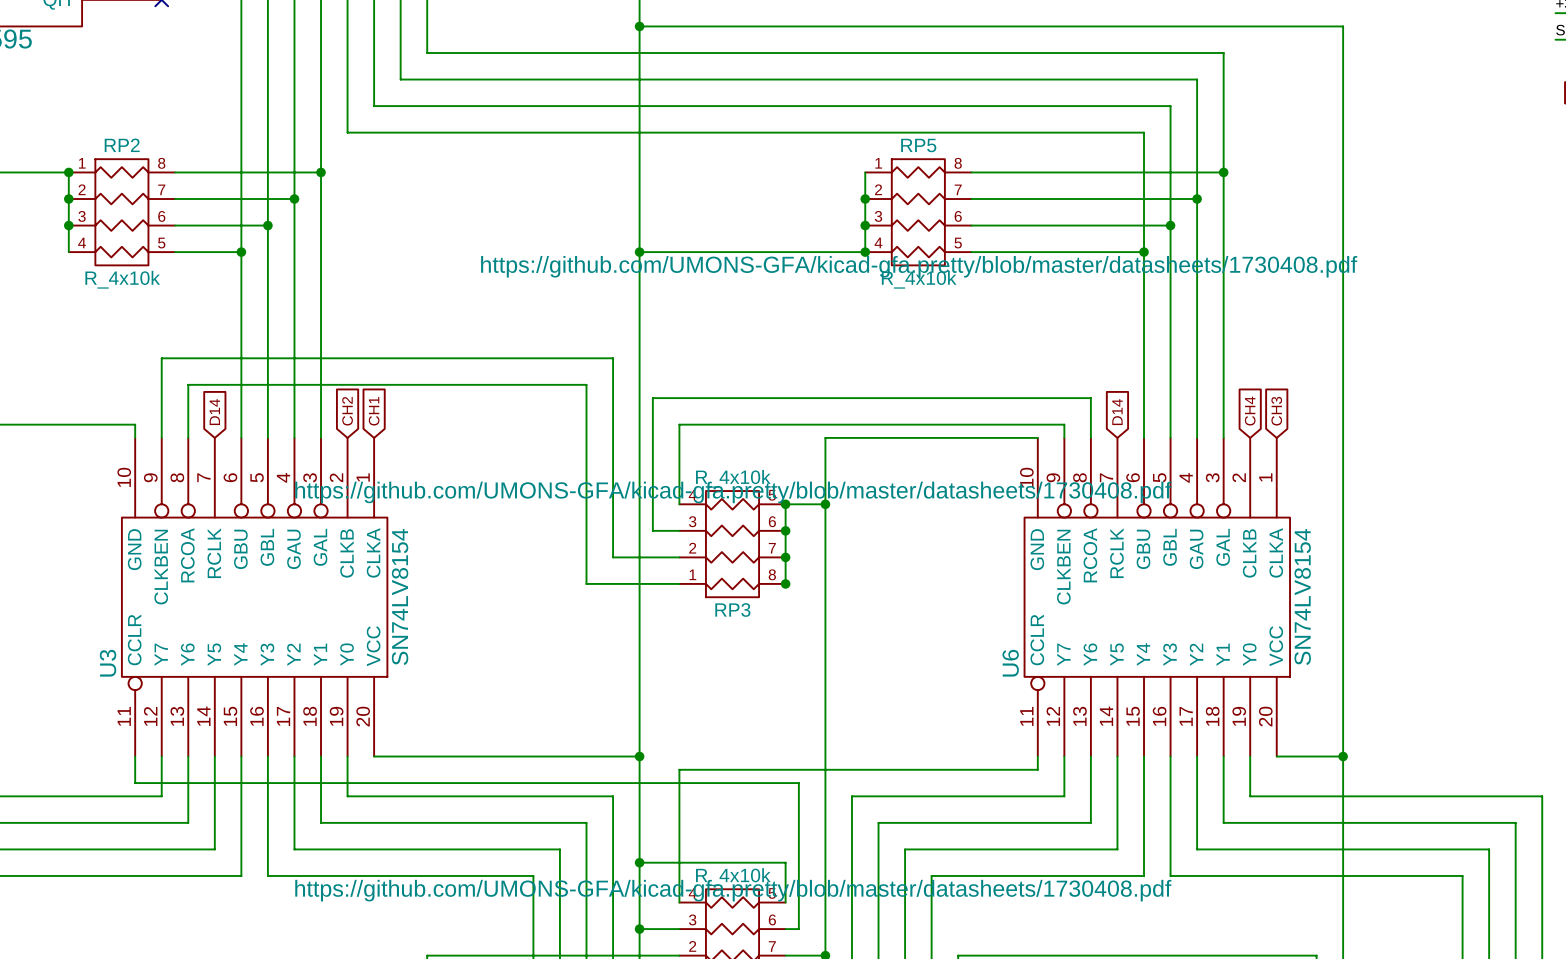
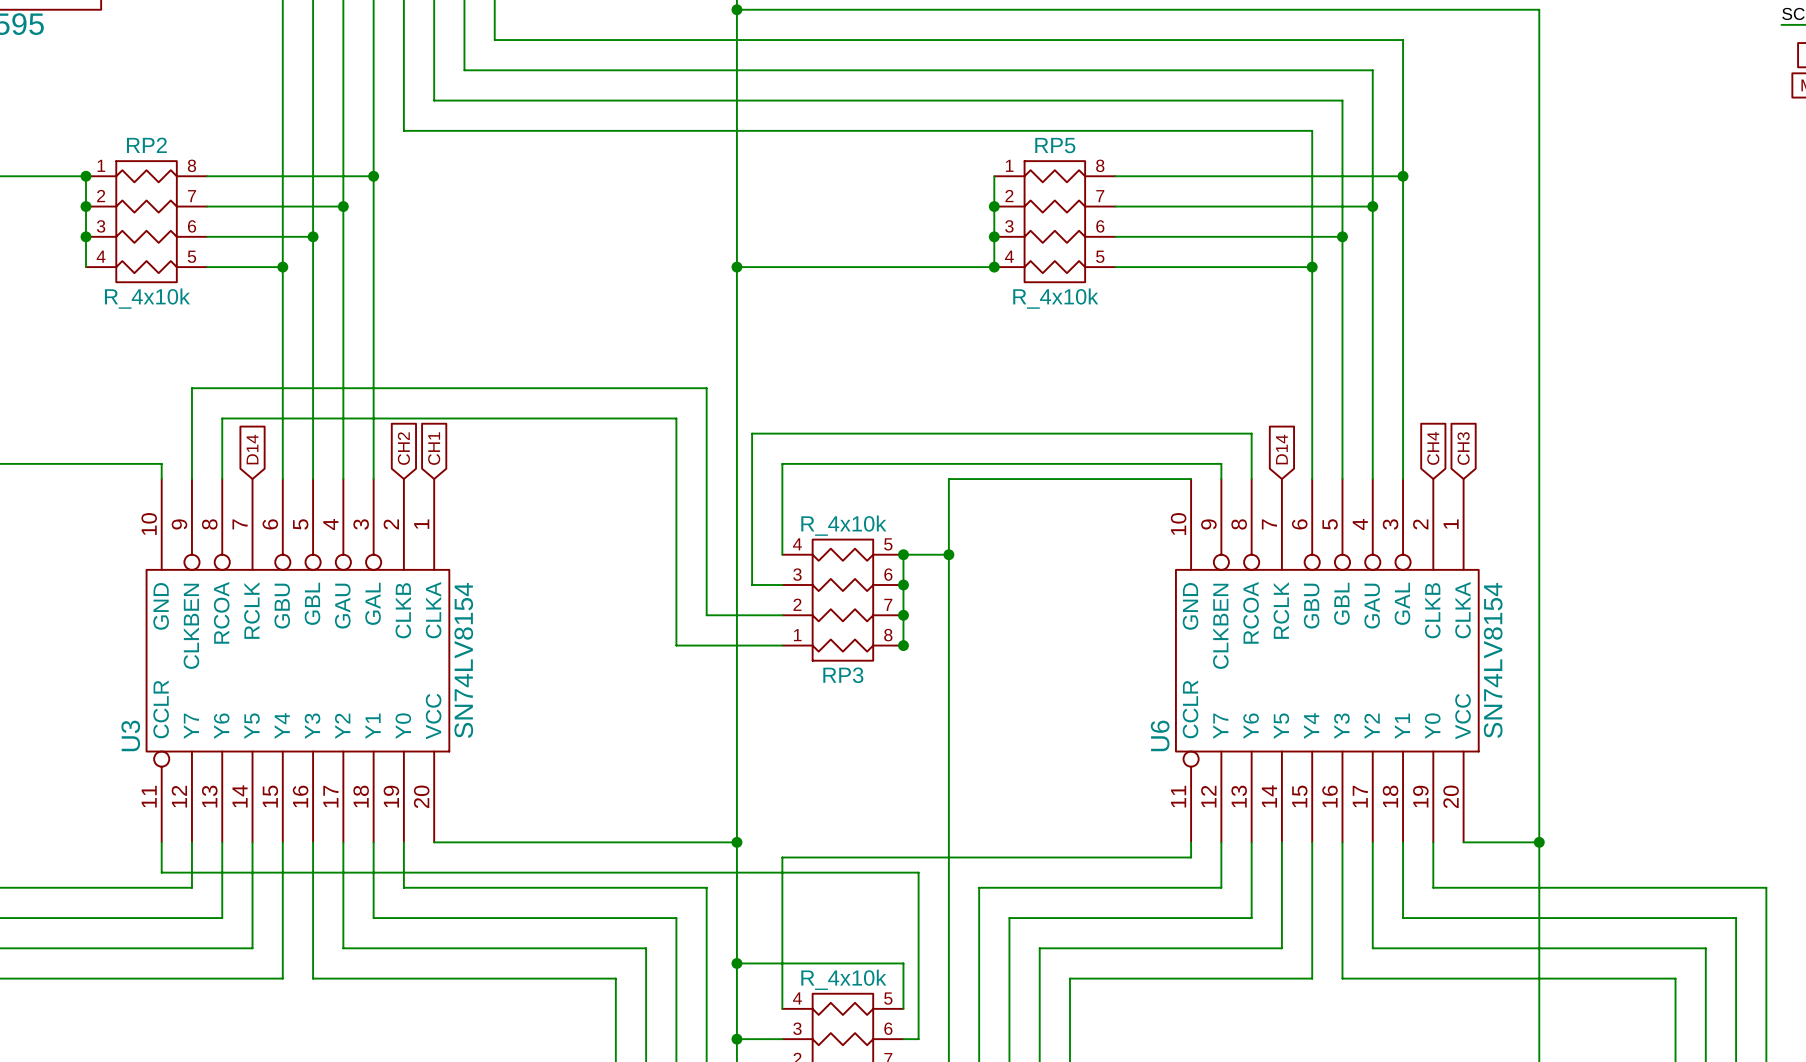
RP5 text: https://github.com/UMONS-GFA/kicad-gfa.pretty/blob/master/datasheets/1730408.pdf (919, 266) -> none
RP3 text: https://github.com/UMONS-GFA/kicad-gfa.pretty/blob/master/datasheets/1730408.pdf (733, 492) -> none
part text: https://github.com/UMONS-GFA/kicad-gfa.pretty/blob/master/datasheets/1730408.pdf (733, 890) -> none

